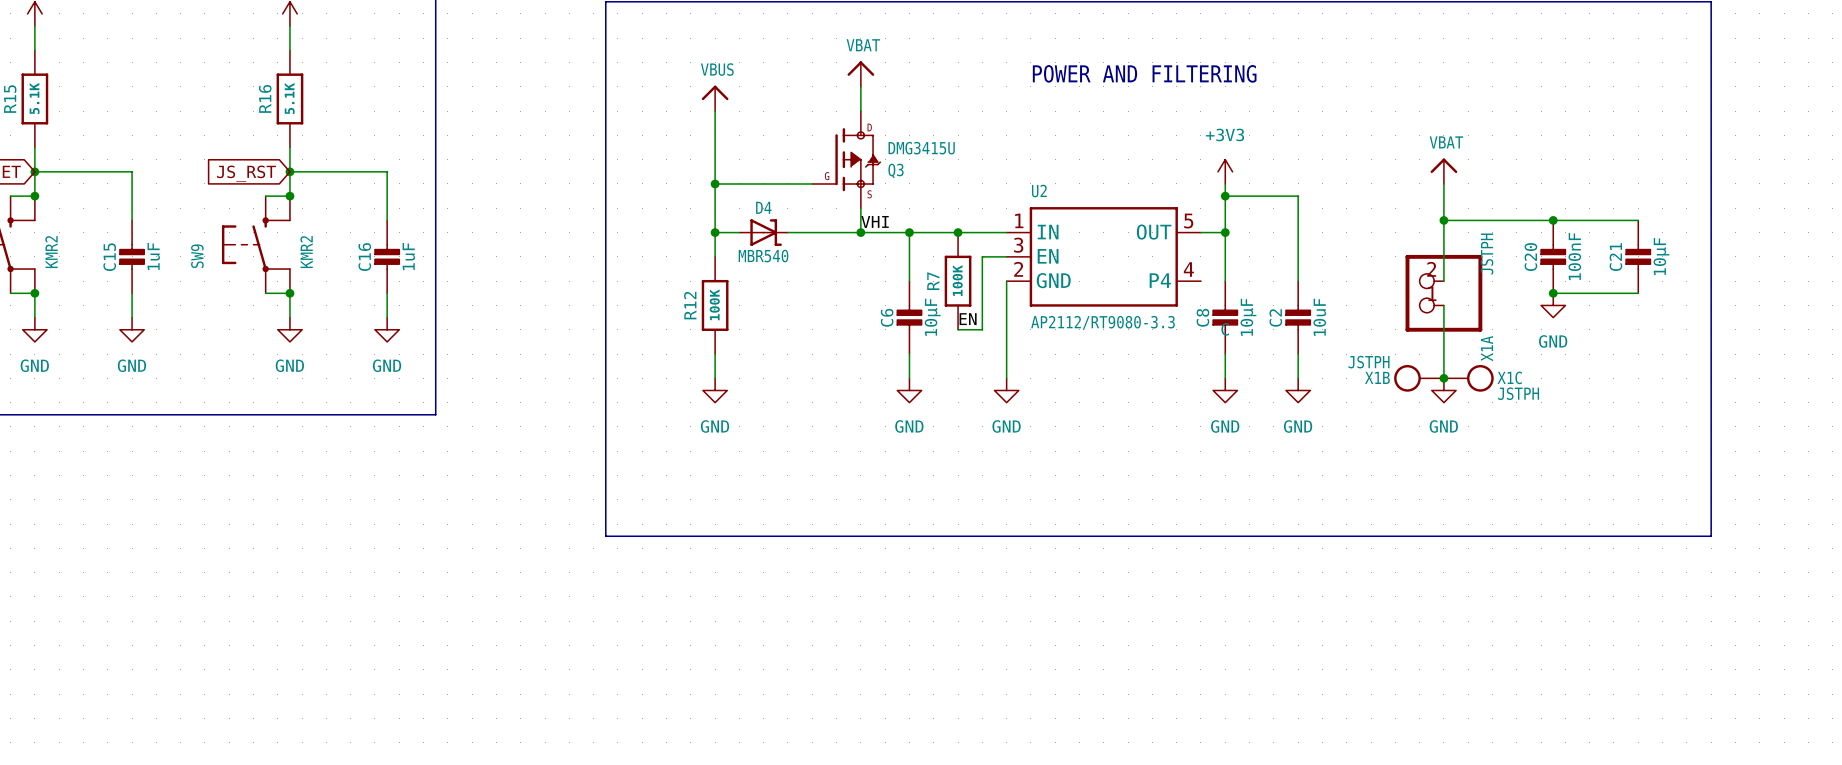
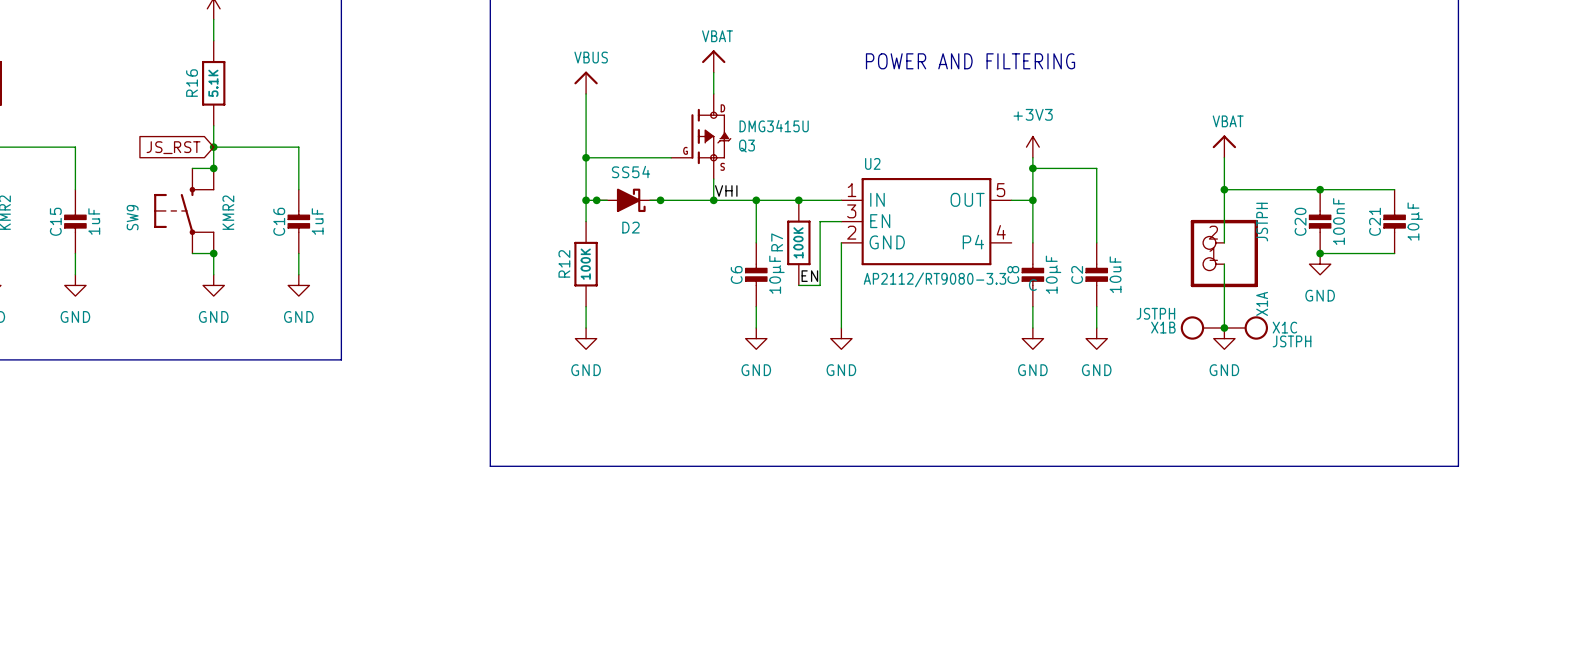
junction: none -> (596, 200)
D4: MBR540 (763, 232) -> none
D2: none -> SS54 (628, 200)
junction: none -> (660, 200)

